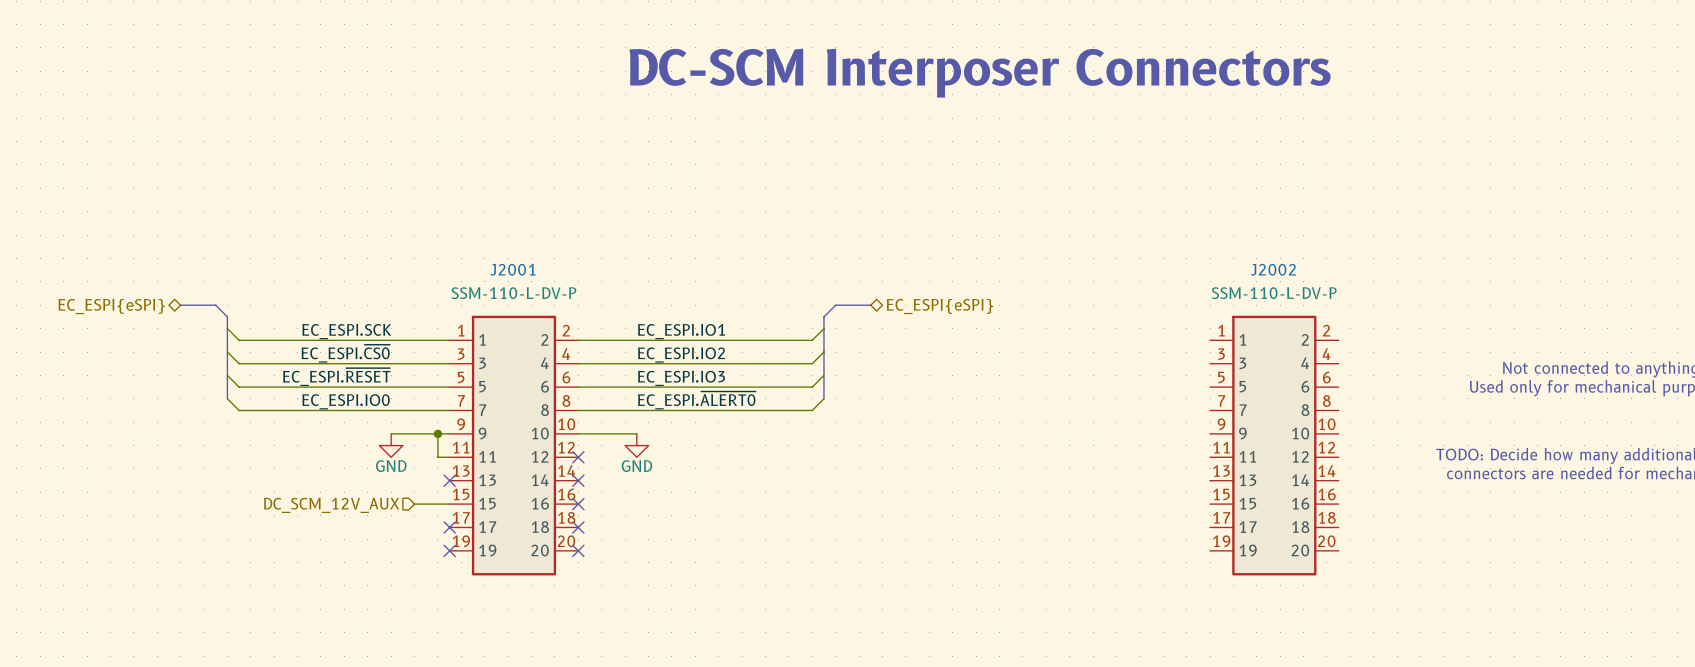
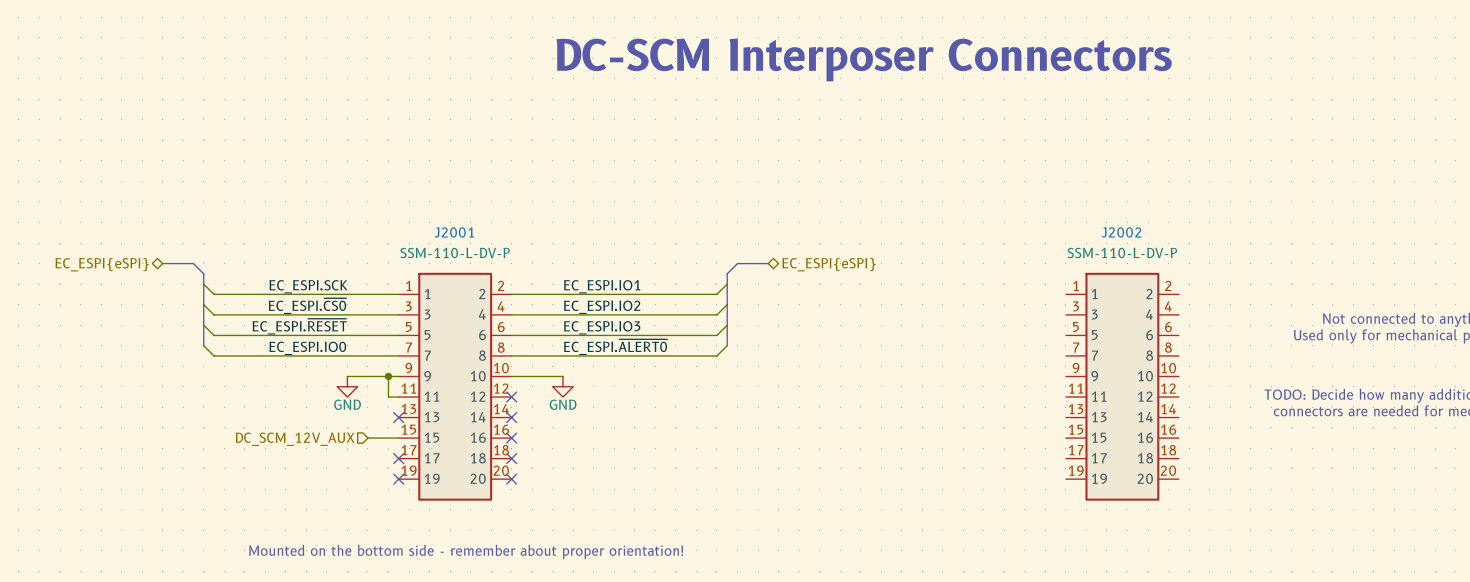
text: none -> Mounted on the bottom side - remember about proper orientation! (466, 551)

